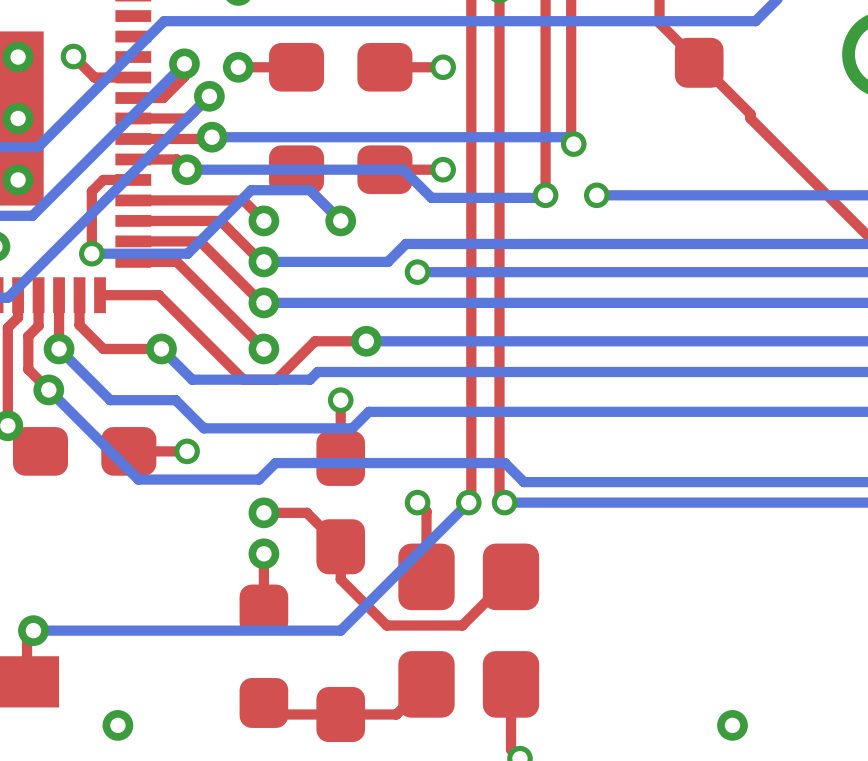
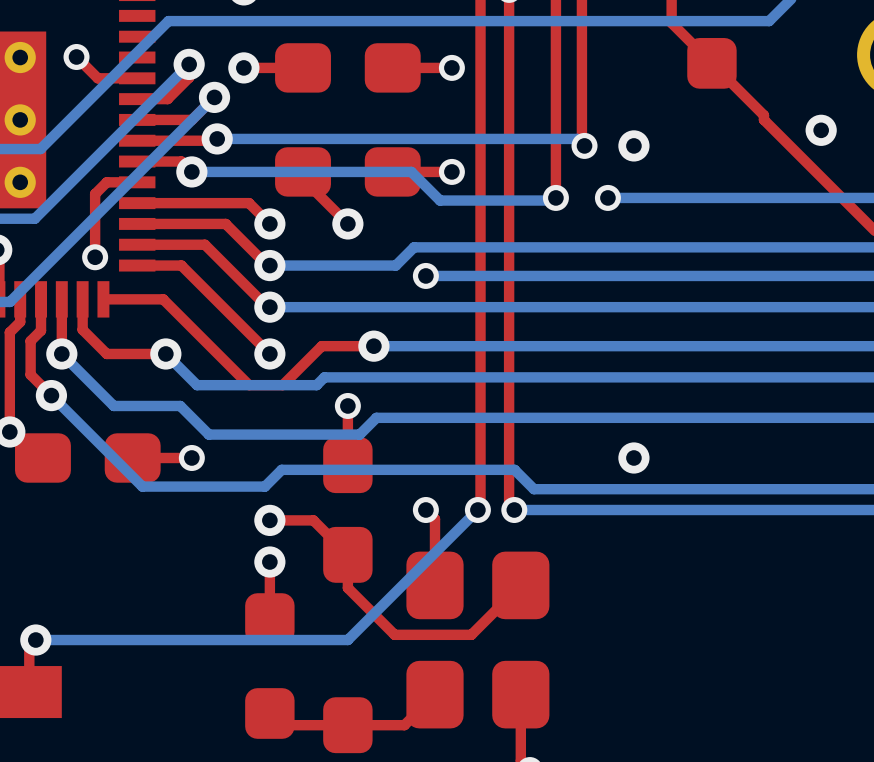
via: none -> (821, 130)
via: none -> (633, 145)
bottom track: (340, 220) (310, 190) (251, 190) (187, 253) (91, 253) -> none
via: none -> (633, 457)
via: (117, 725) -> none
via: (732, 725) -> none

